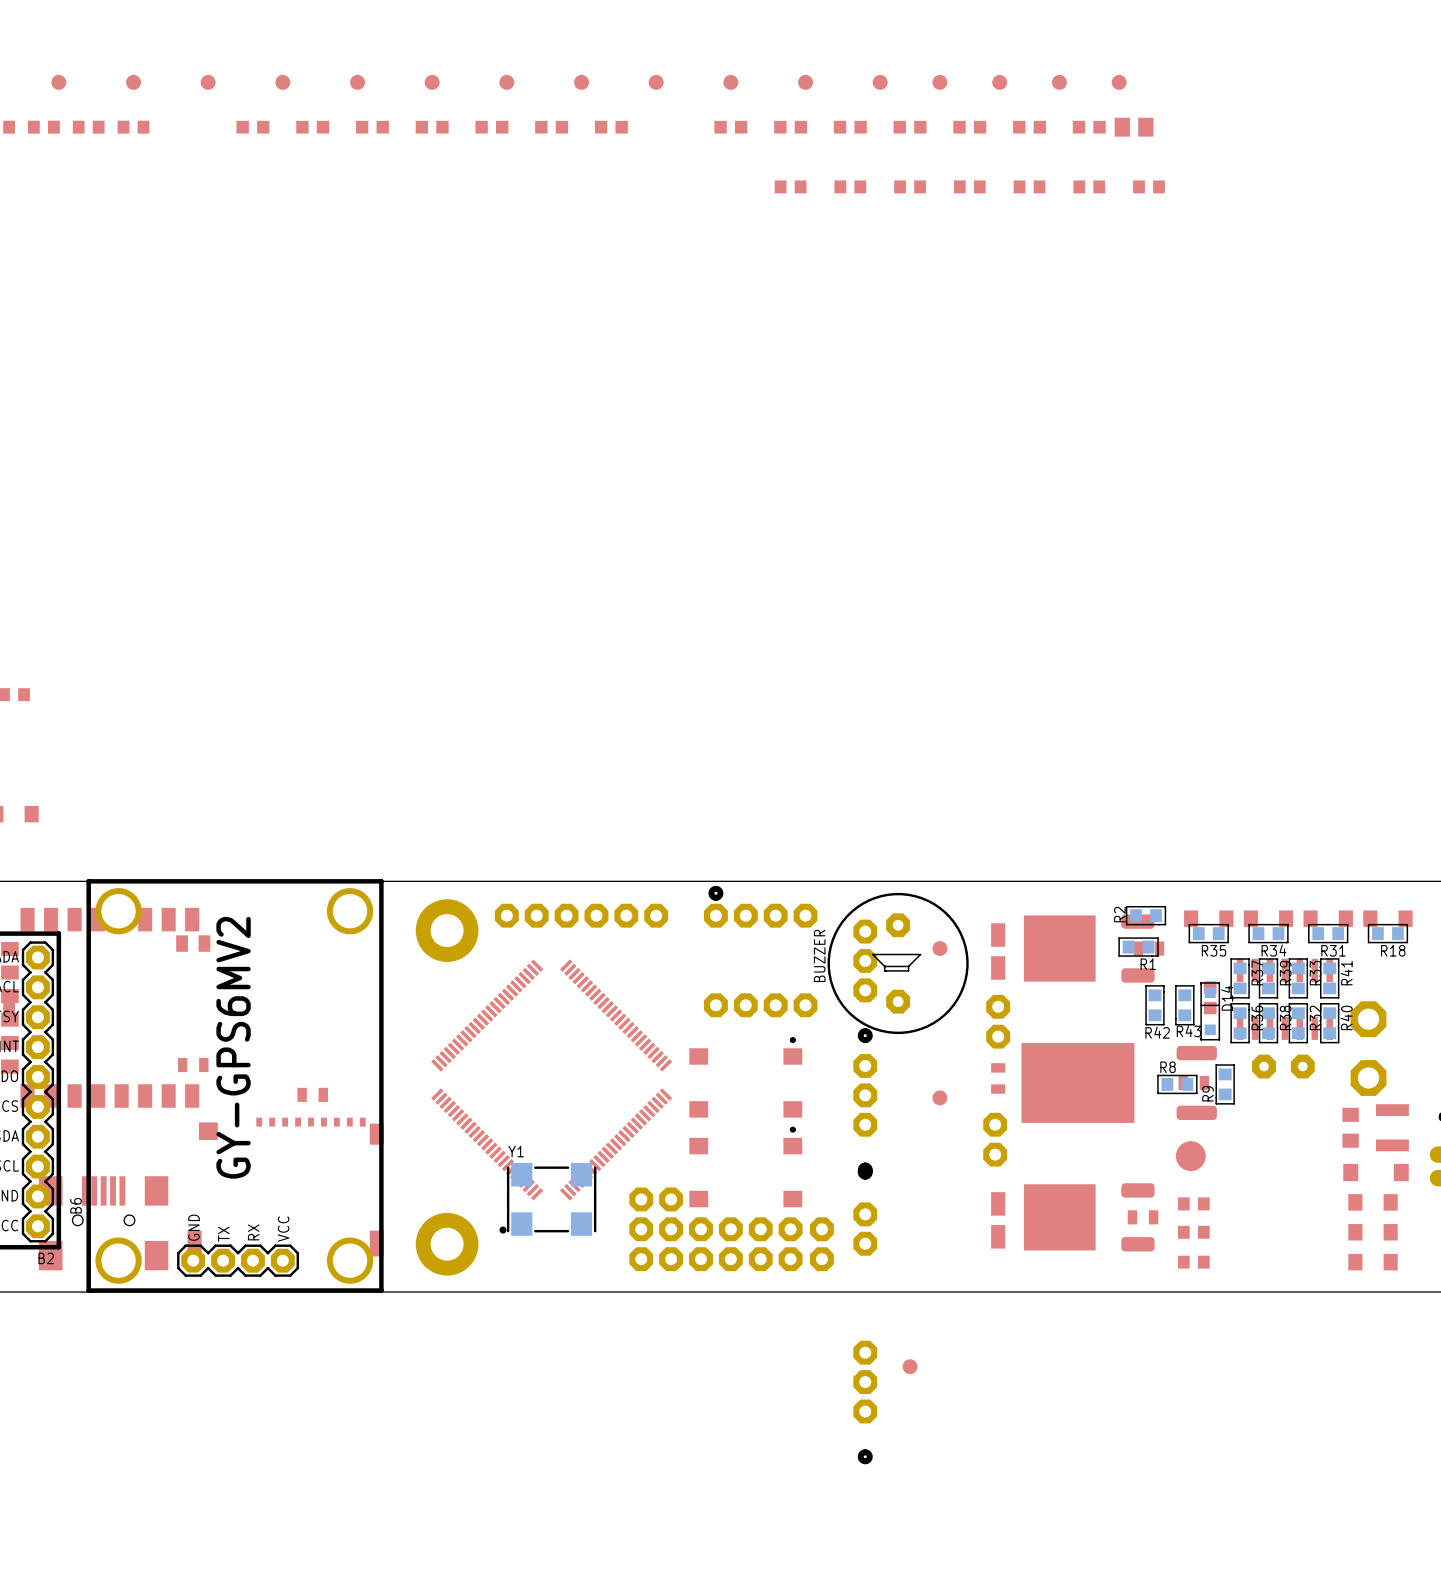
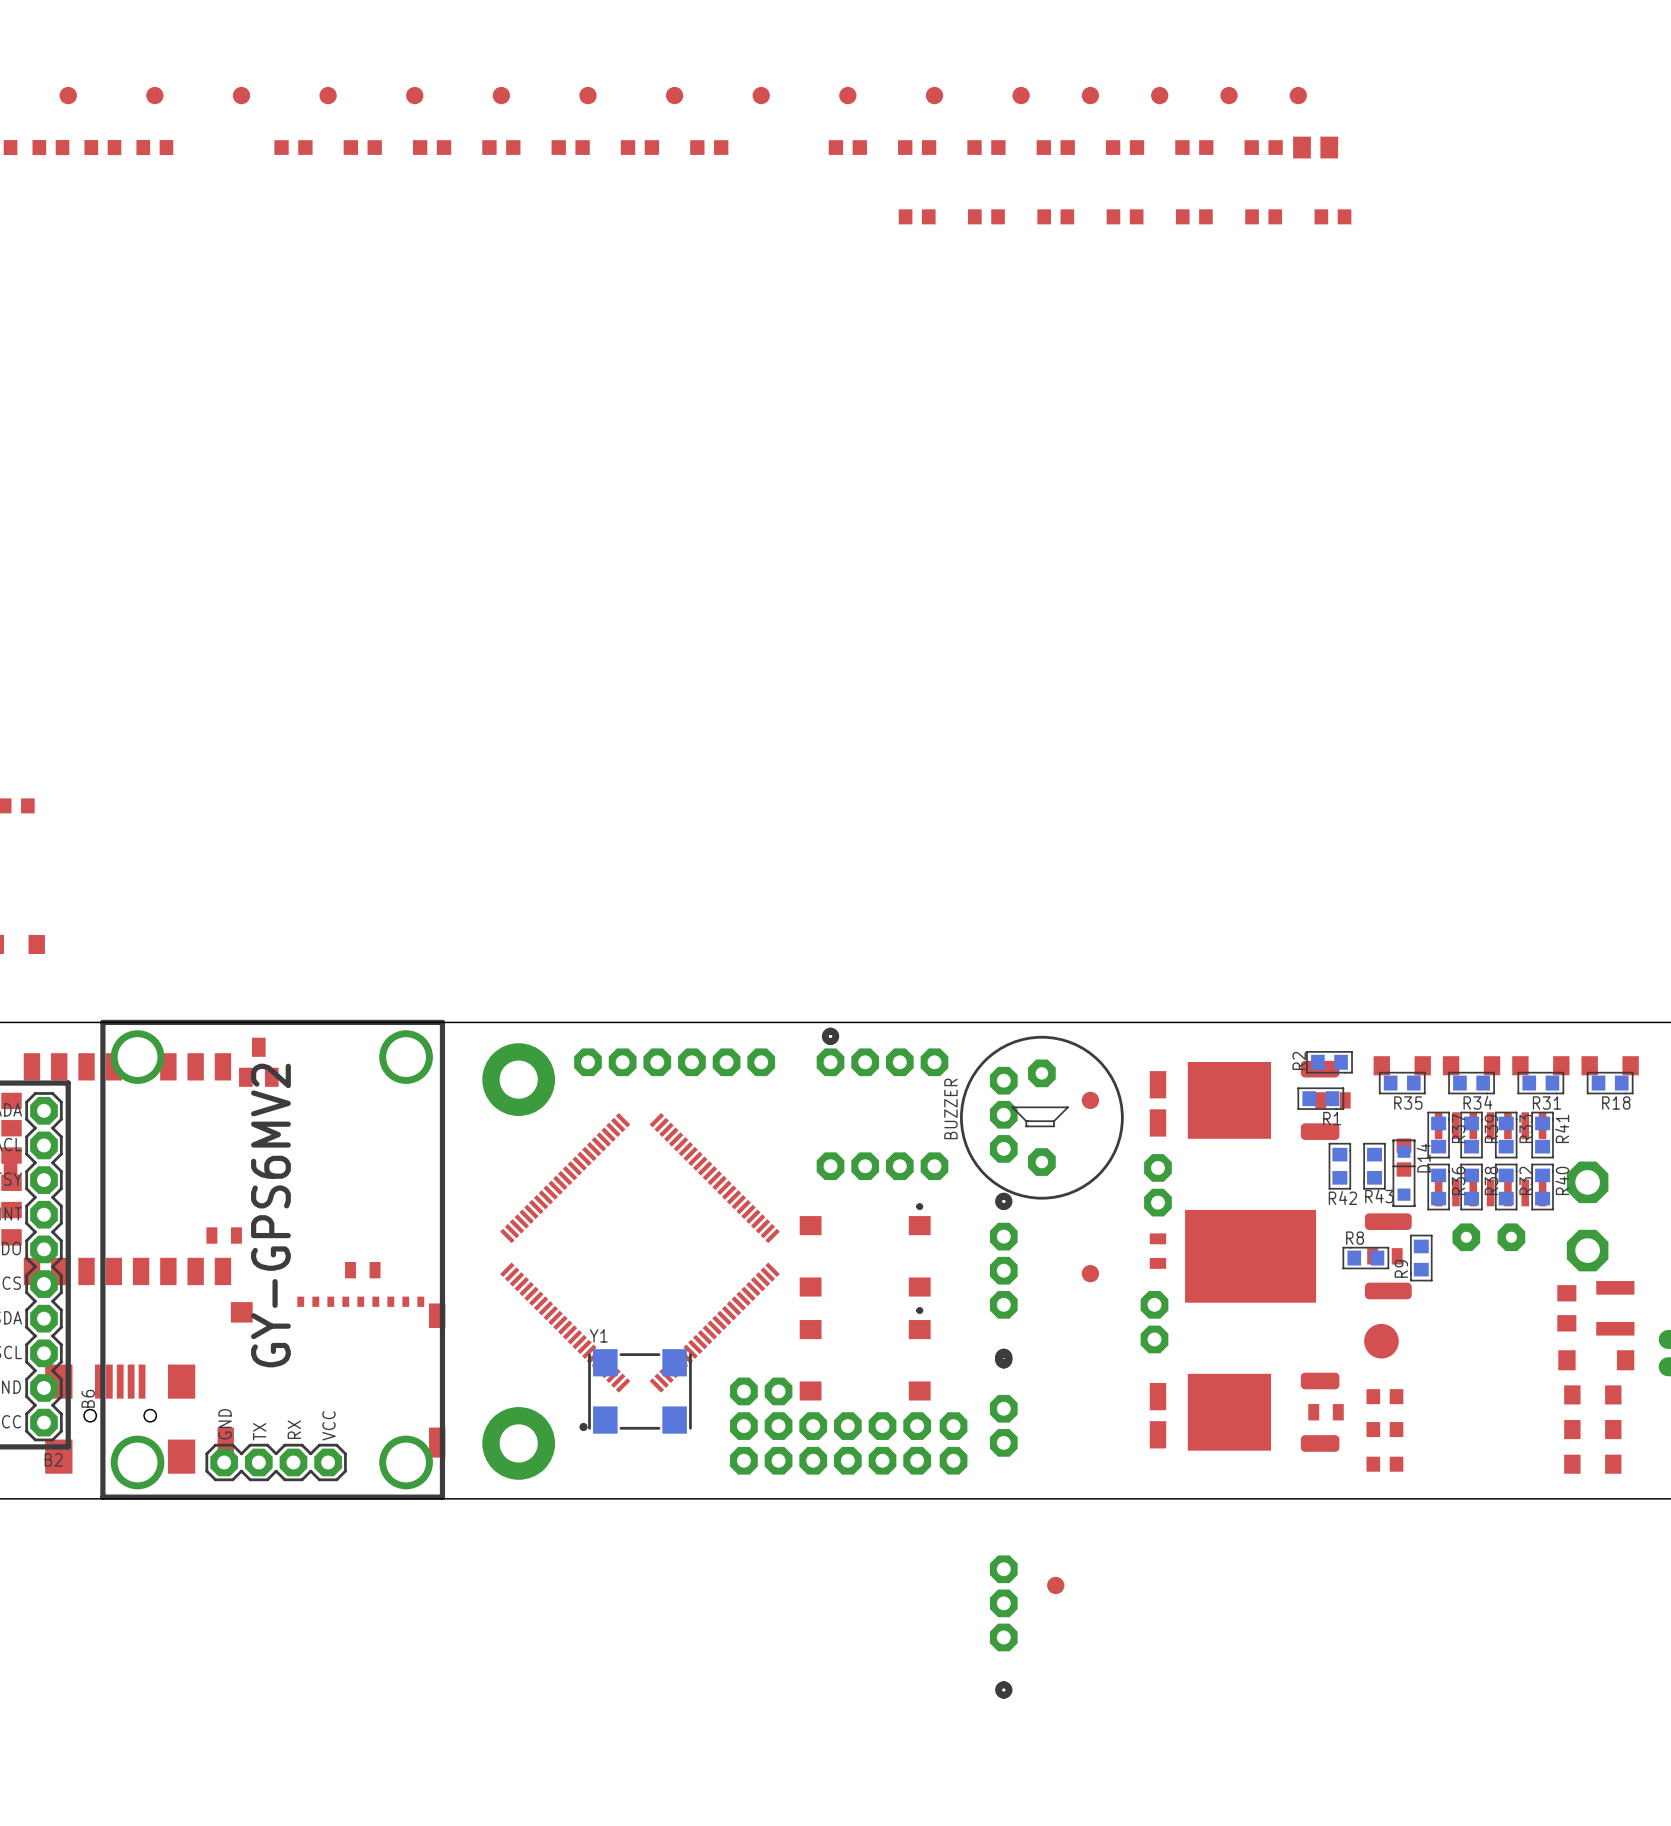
part position: (193, 930) -> (258, 1062)

